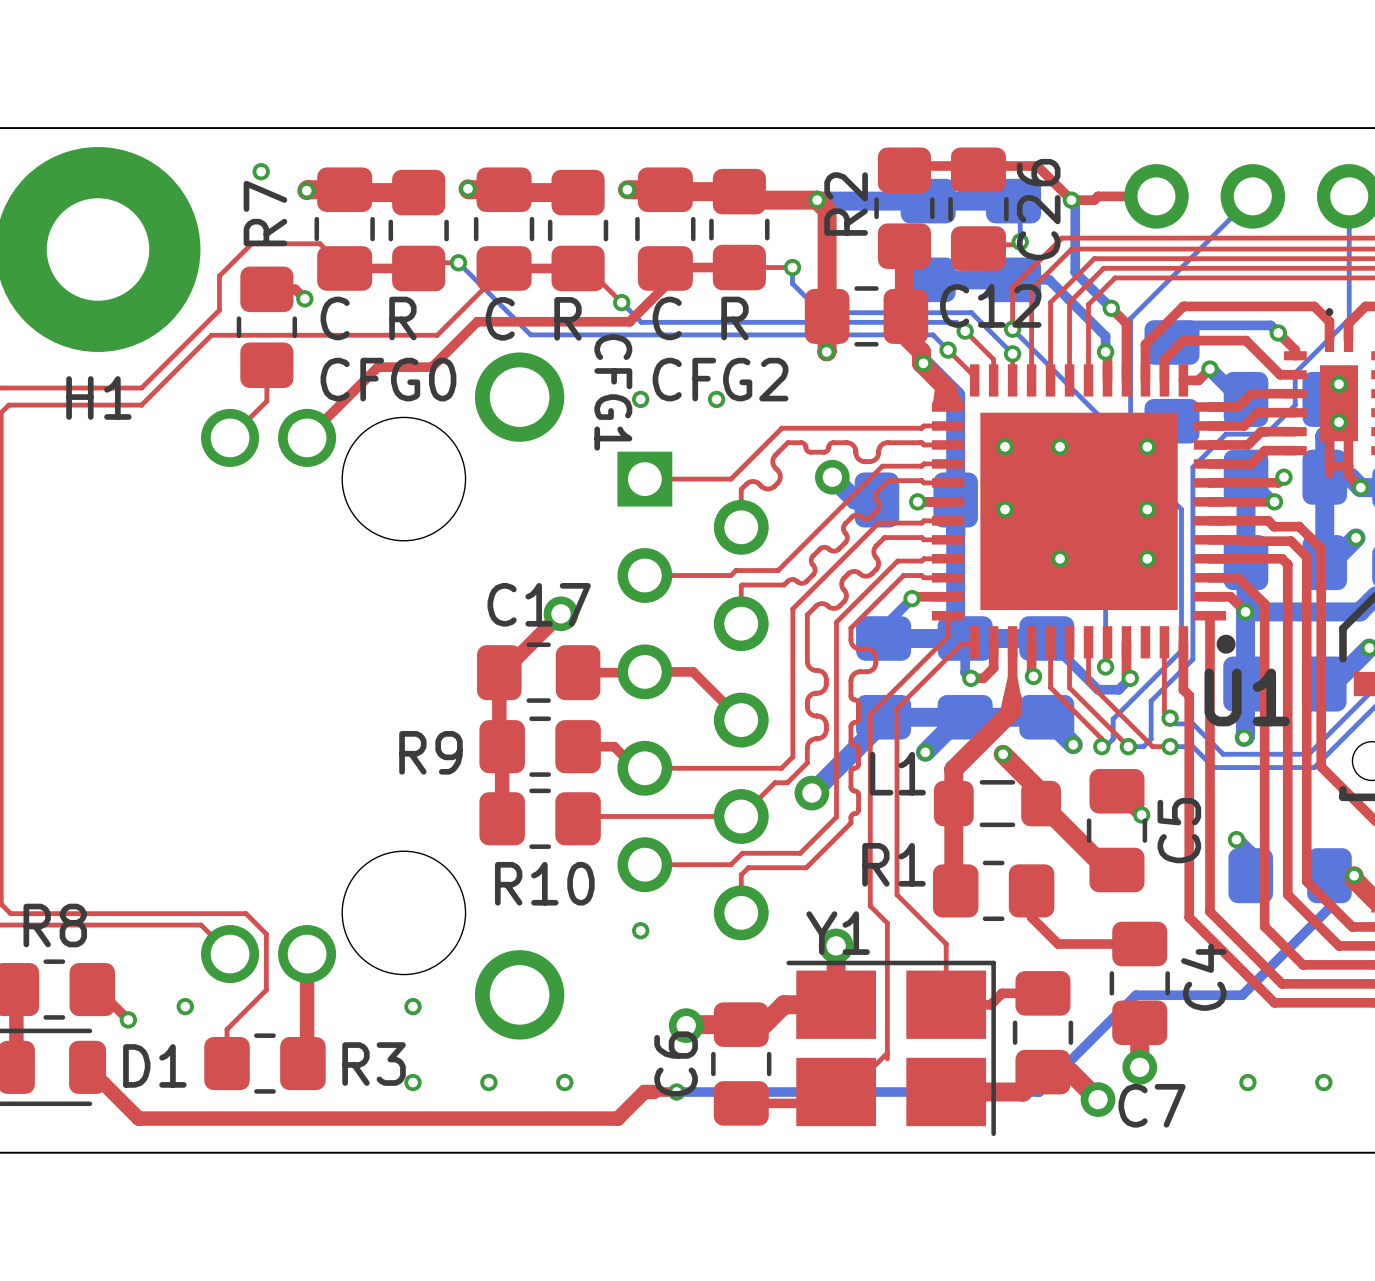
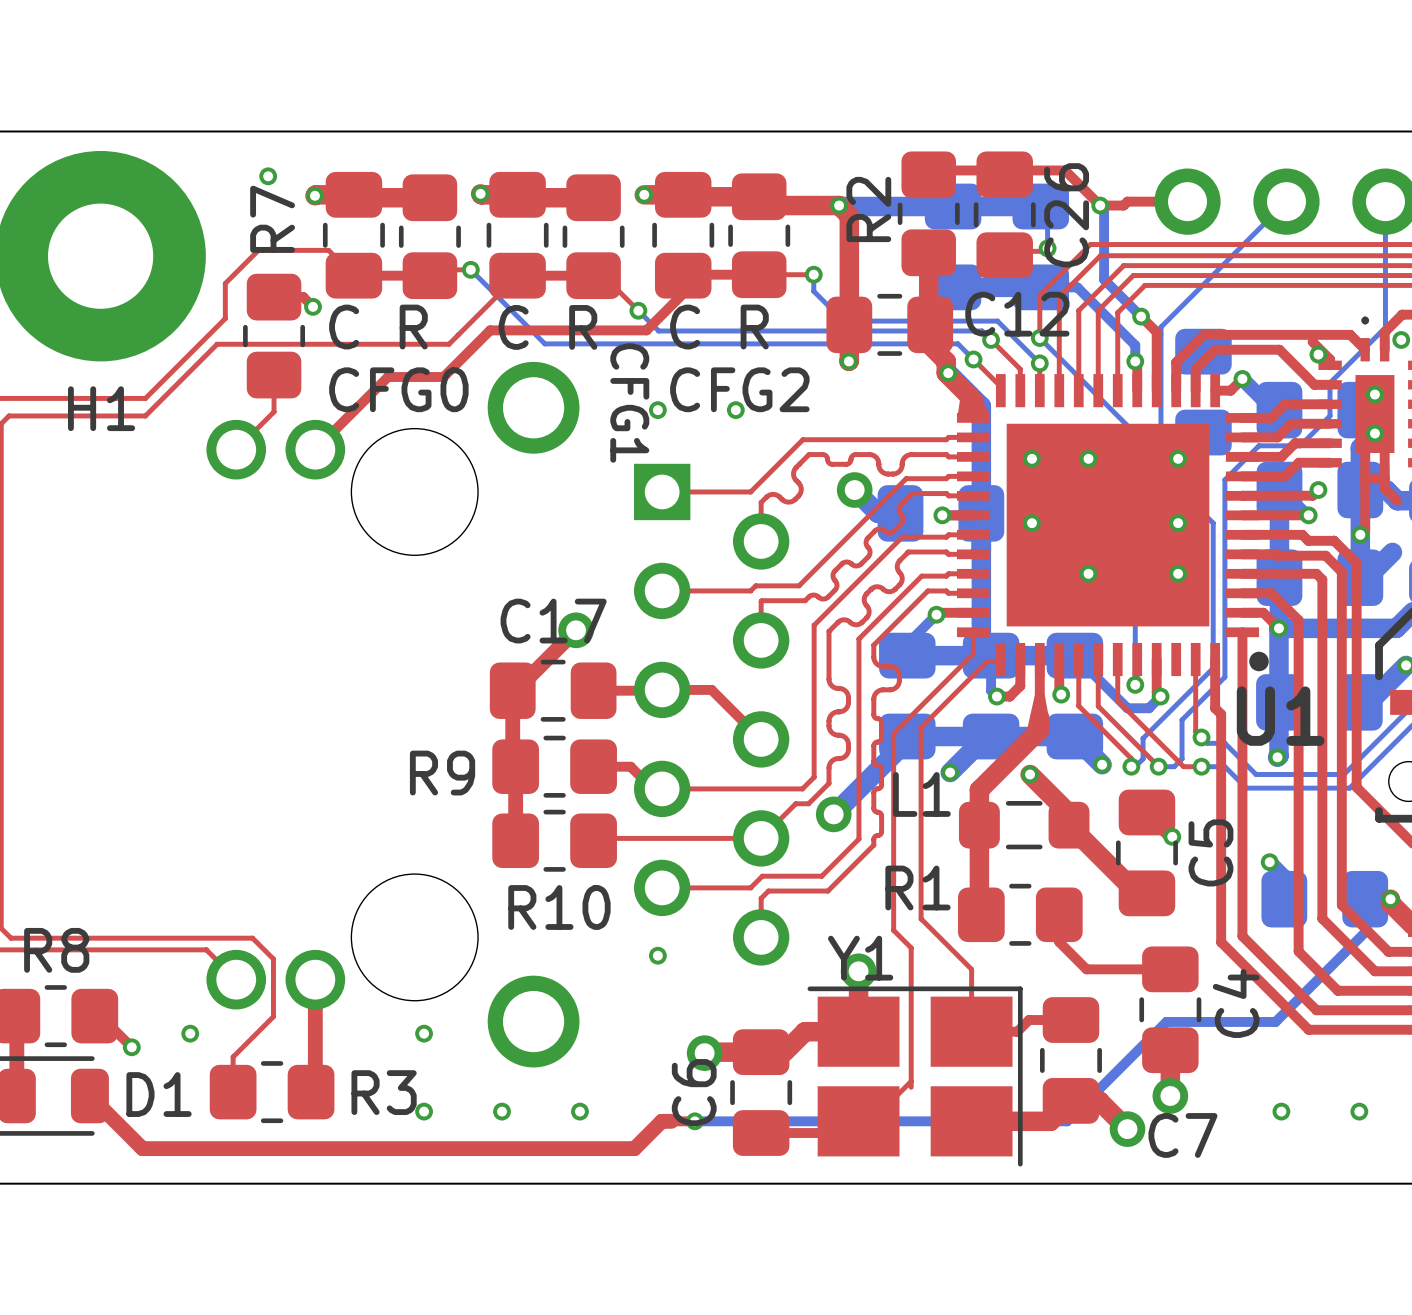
bottom track: (1189, 325) (1270, 325) (1278, 332) -> none
via: none -> (1401, 339)
via position: (1278, 332) -> (1318, 354)
top track: (1329, 340) (1329, 321) (1314, 306) (1183, 306) (1145, 344) (1145, 352) -> (1365, 349) (1350, 334) (1203, 334) (1176, 362)
top track: none -> (1365, 478) (1365, 529) (1360, 534)
via: (1360, 487) -> none
via: none -> (1360, 534)
via: (1356, 537) -> none

